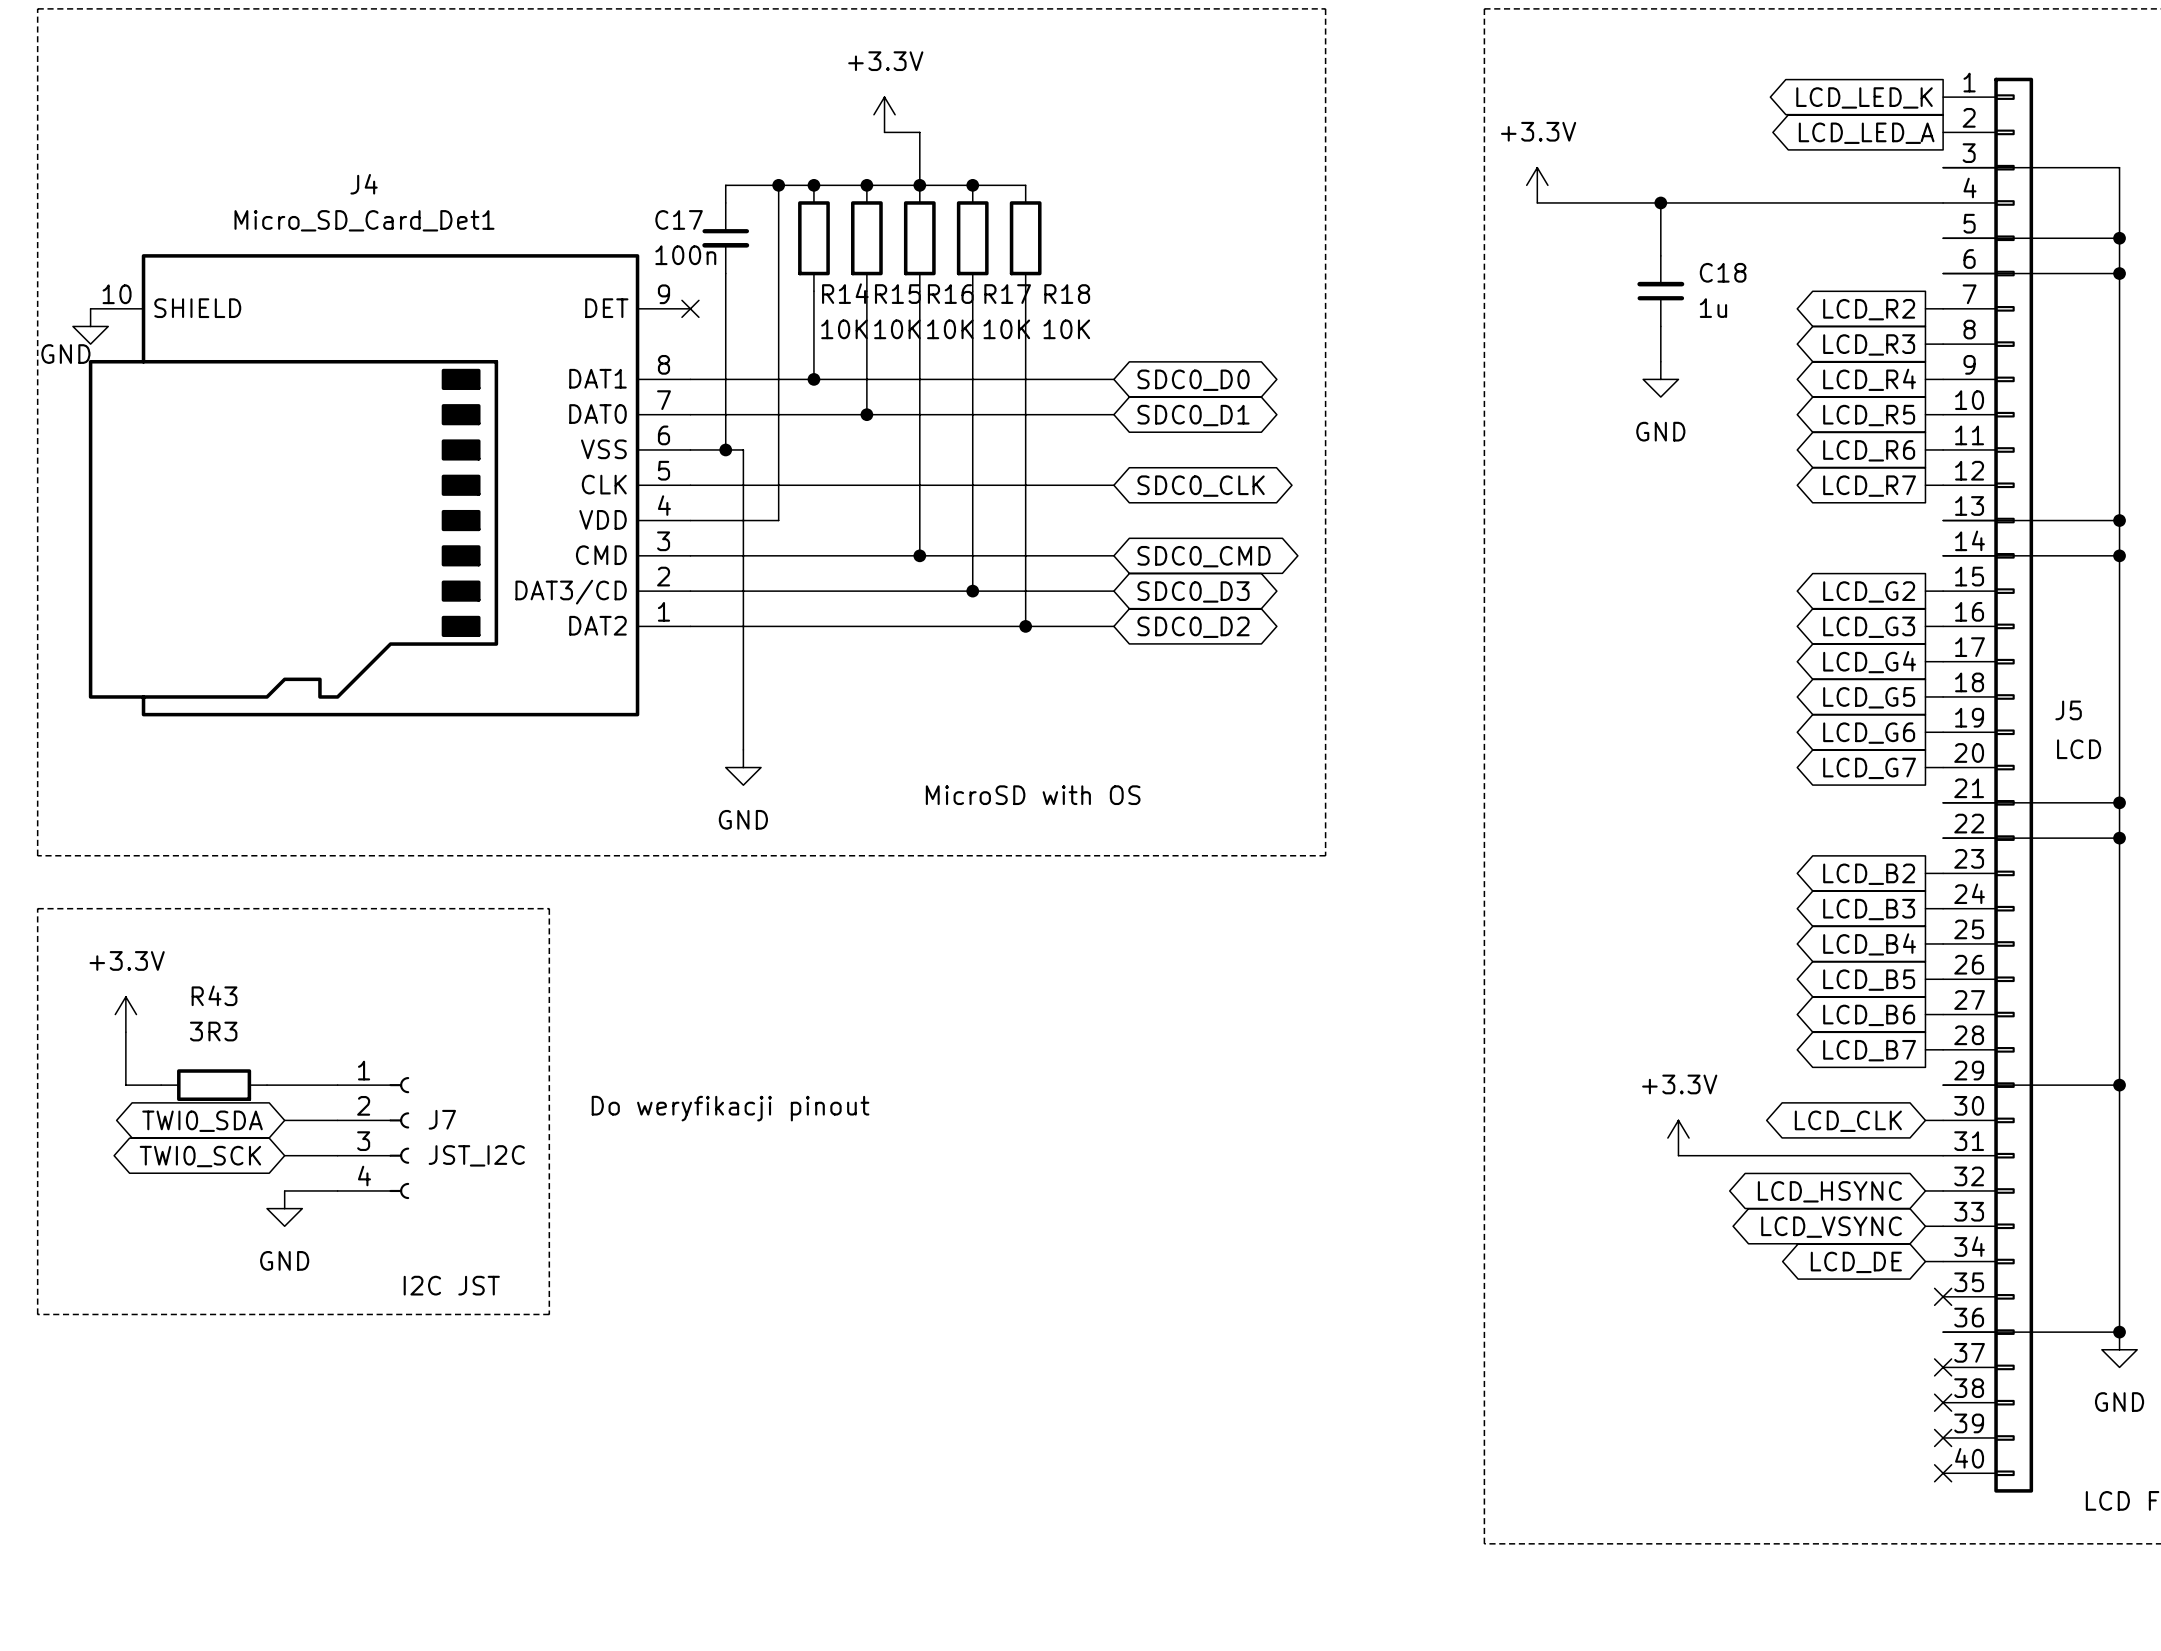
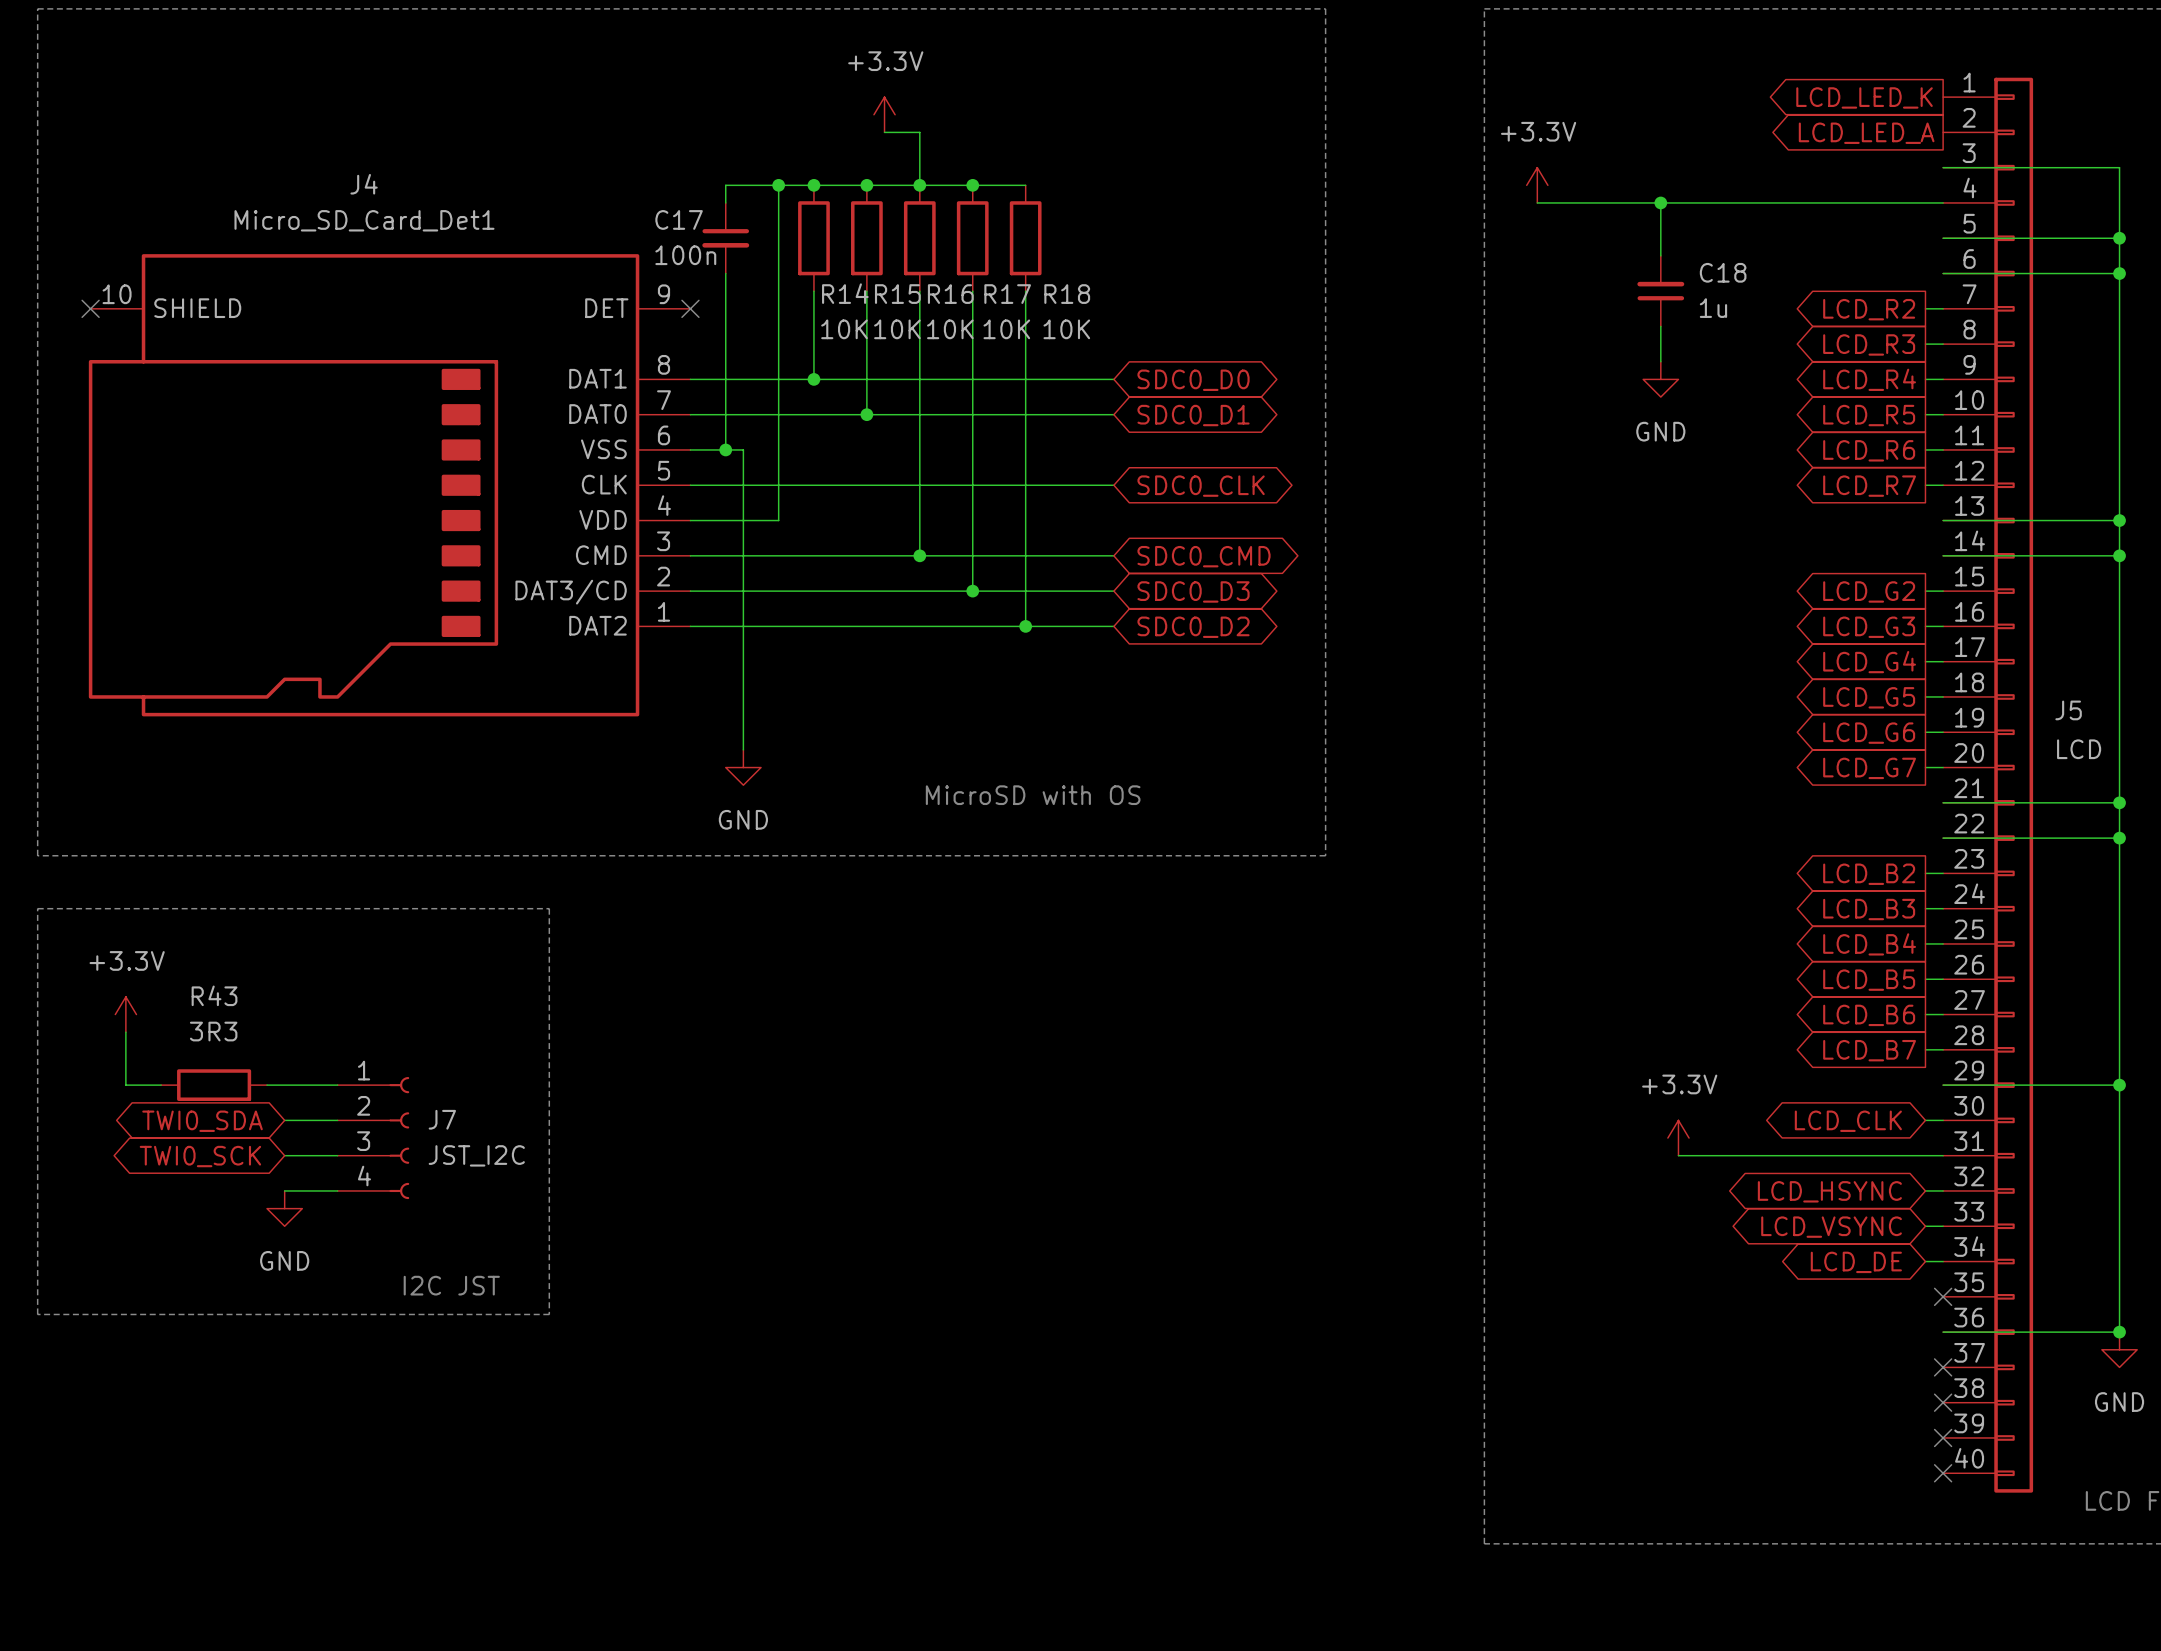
no-connect mark: none -> (90, 308)
power symbol: GND (90, 326) -> none
text: Do weryfikacji pinout (730, 1108) -> none

